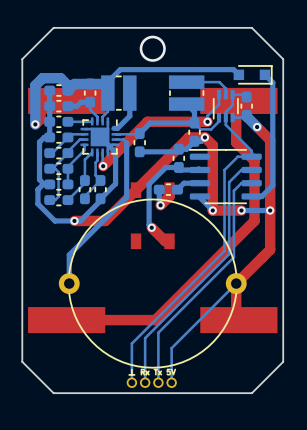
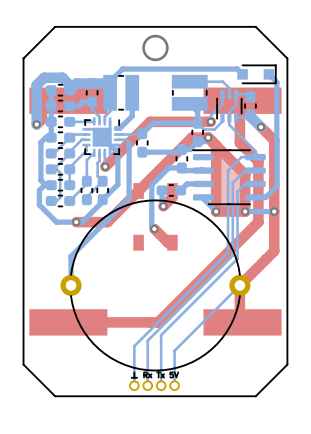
top track: none -> (216, 145) (245, 174) (245, 211)

